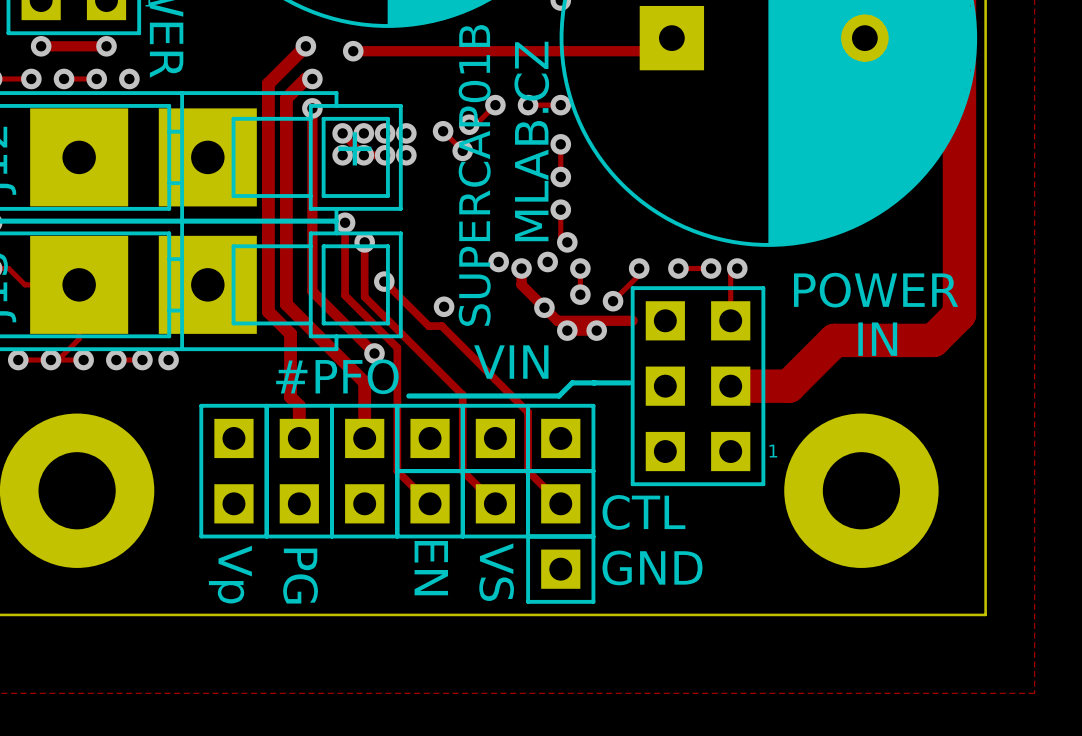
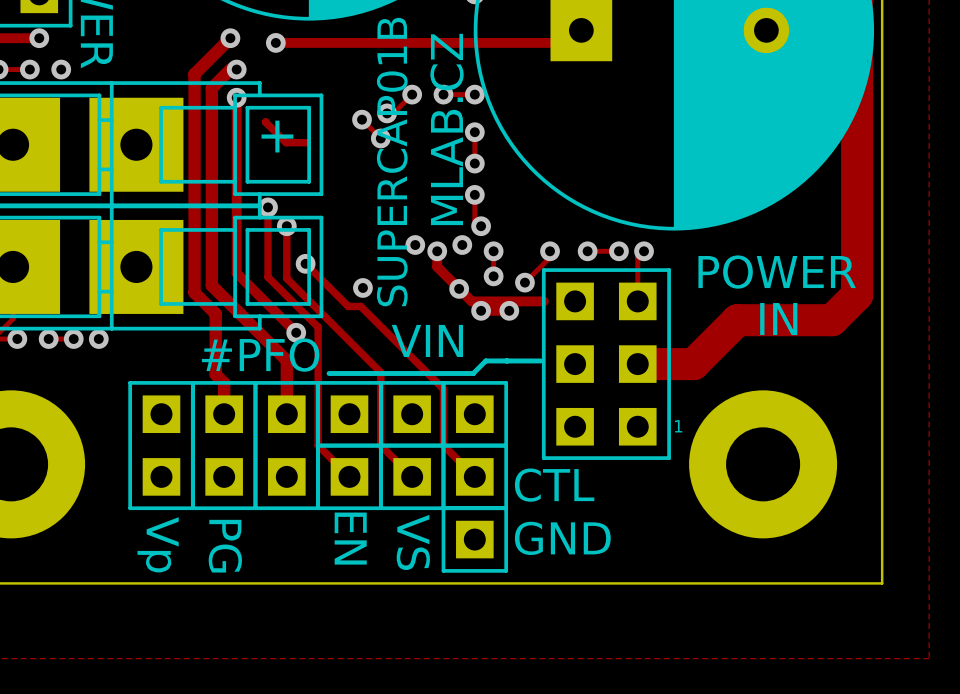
via: (342, 133) -> none
via: (363, 133) -> none
via: (385, 133) -> none
via: (406, 133) -> none
via: (342, 155) -> none
via: (363, 155) -> none
via: (385, 155) -> none
via: (406, 155) -> none

